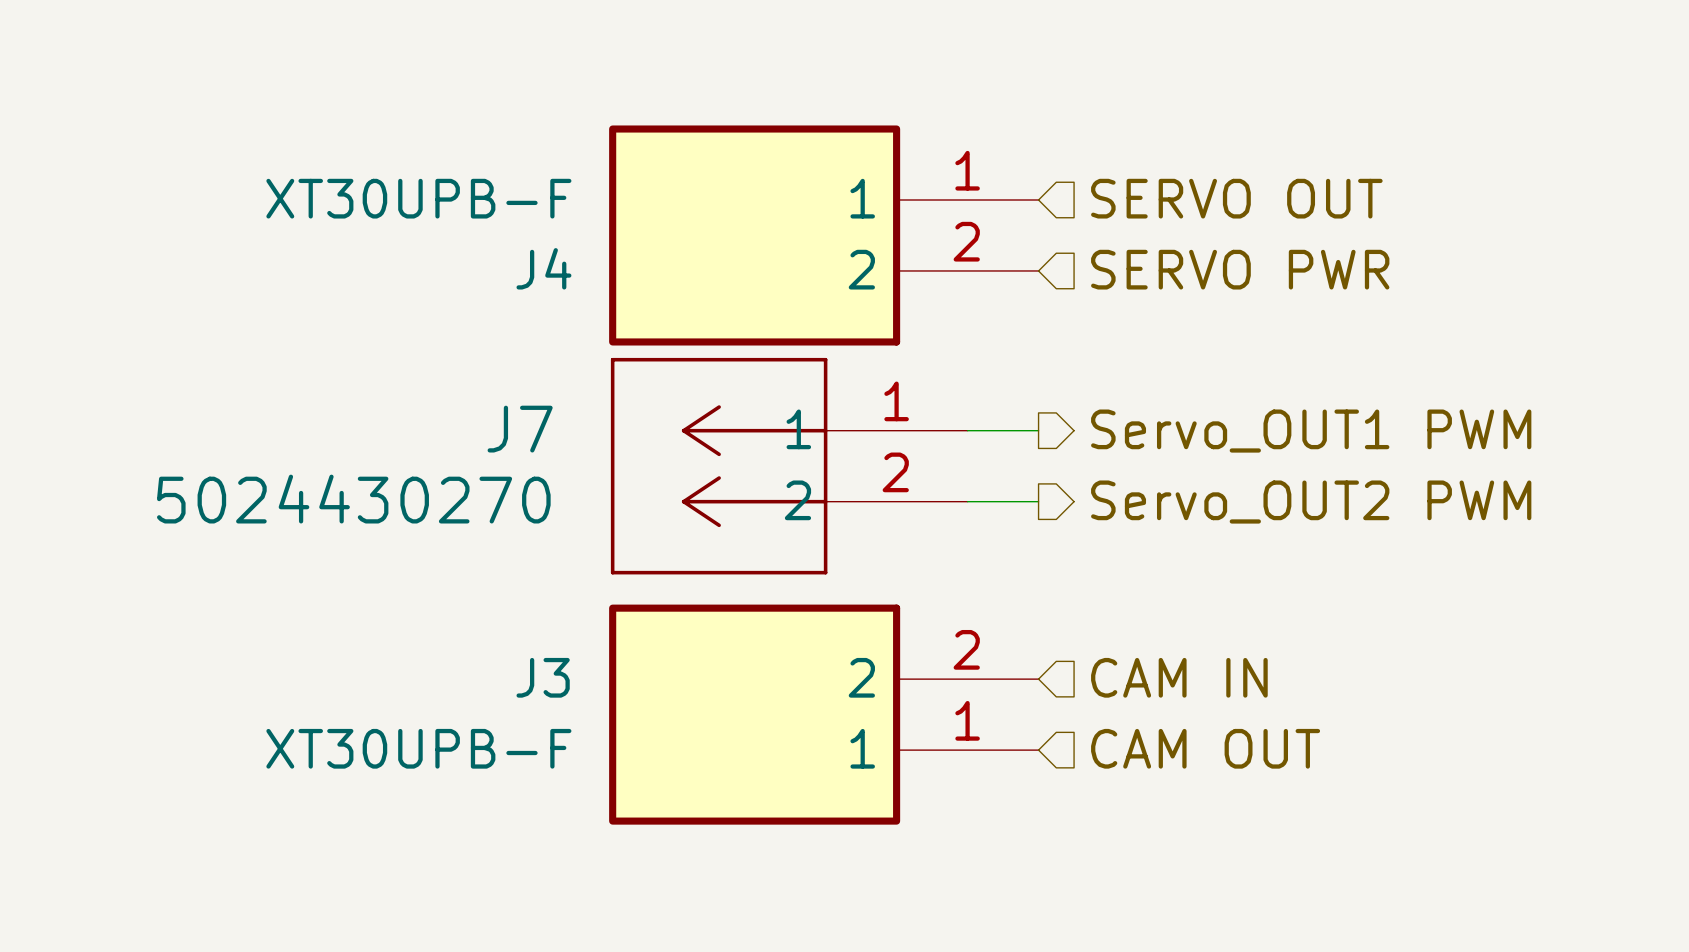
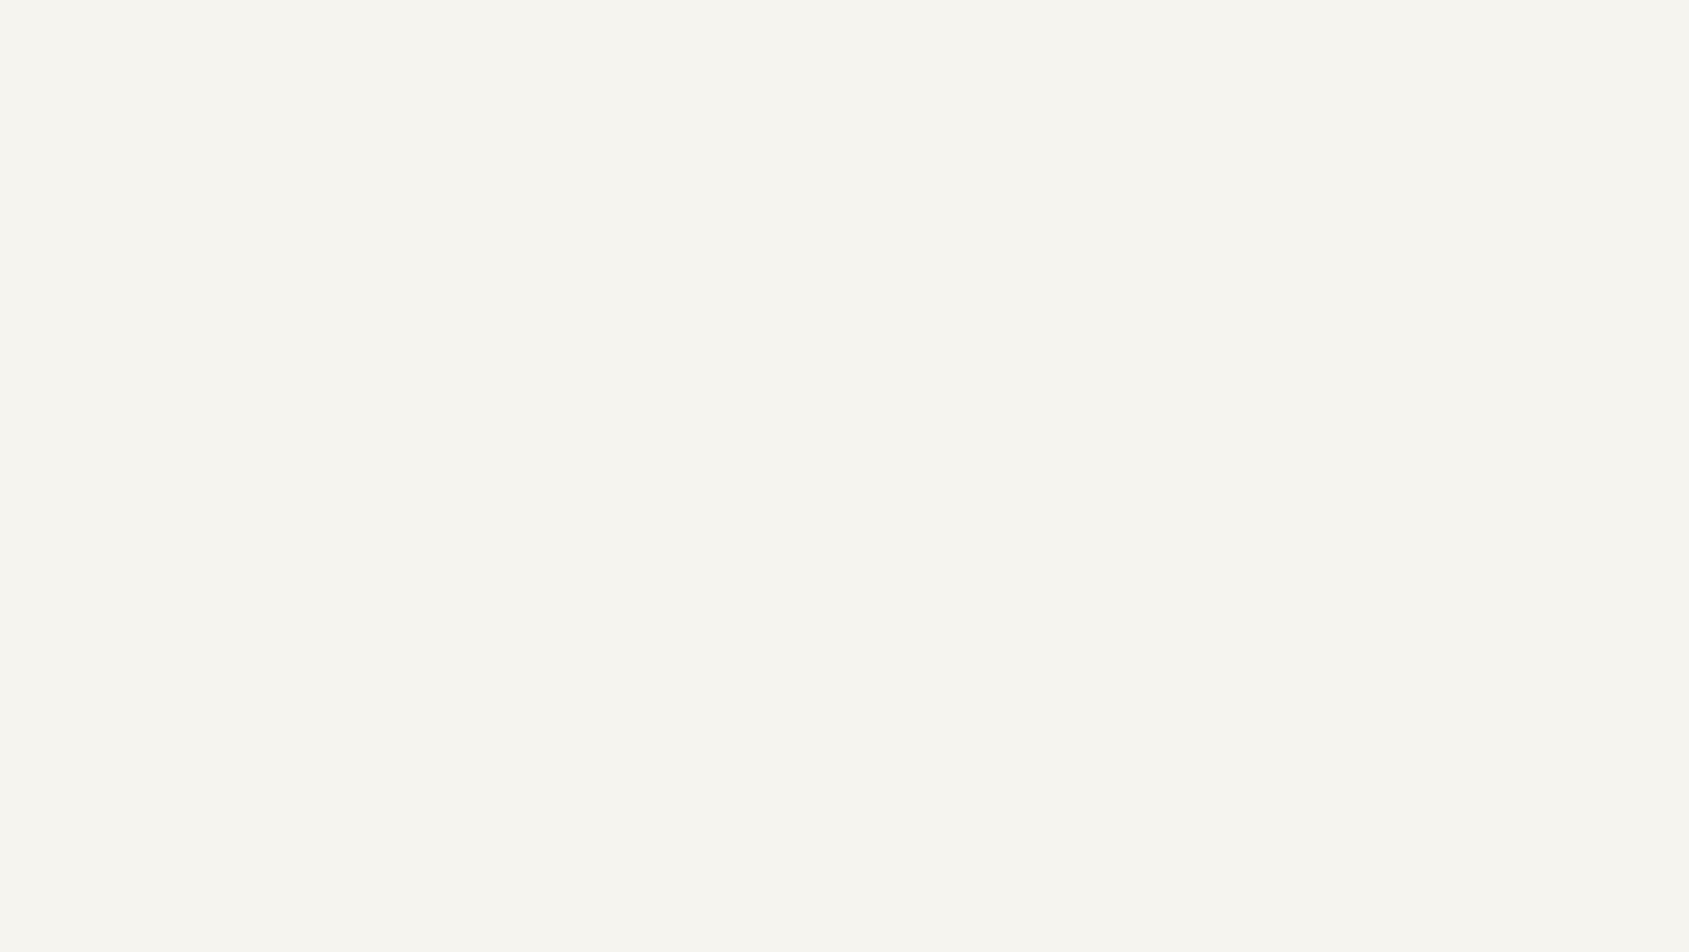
hierarchical label: SERVO OUT (1236, 198) -> none
J4: XT30UPB-F (823, 235) -> none
hierarchical label: SERVO PWR (1240, 269) -> none
wire: (967, 430) (1038, 430) -> none
hierarchical label: Servo_OUT1 PWM (1311, 431) -> none
J7: 5024430270 (789, 466) -> none
wire: (967, 501) (1038, 501) -> none
hierarchical label: Servo_OUT2 PWM (1311, 502) -> none
hierarchical label: CAM IN (1179, 677) -> none
J3: XT30UPB-F (823, 714) -> none
hierarchical label: CAM OUT (1205, 748) -> none

